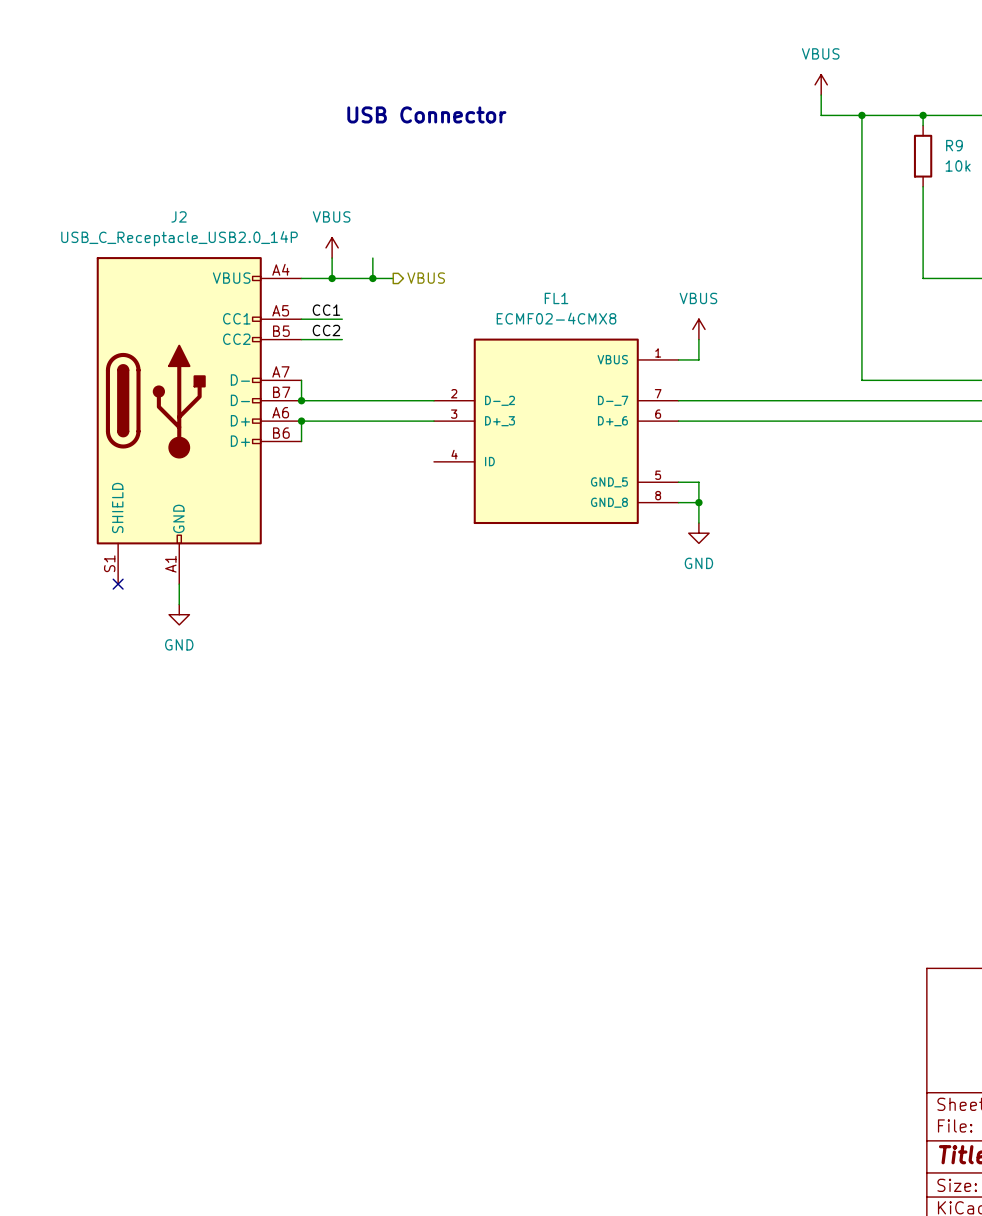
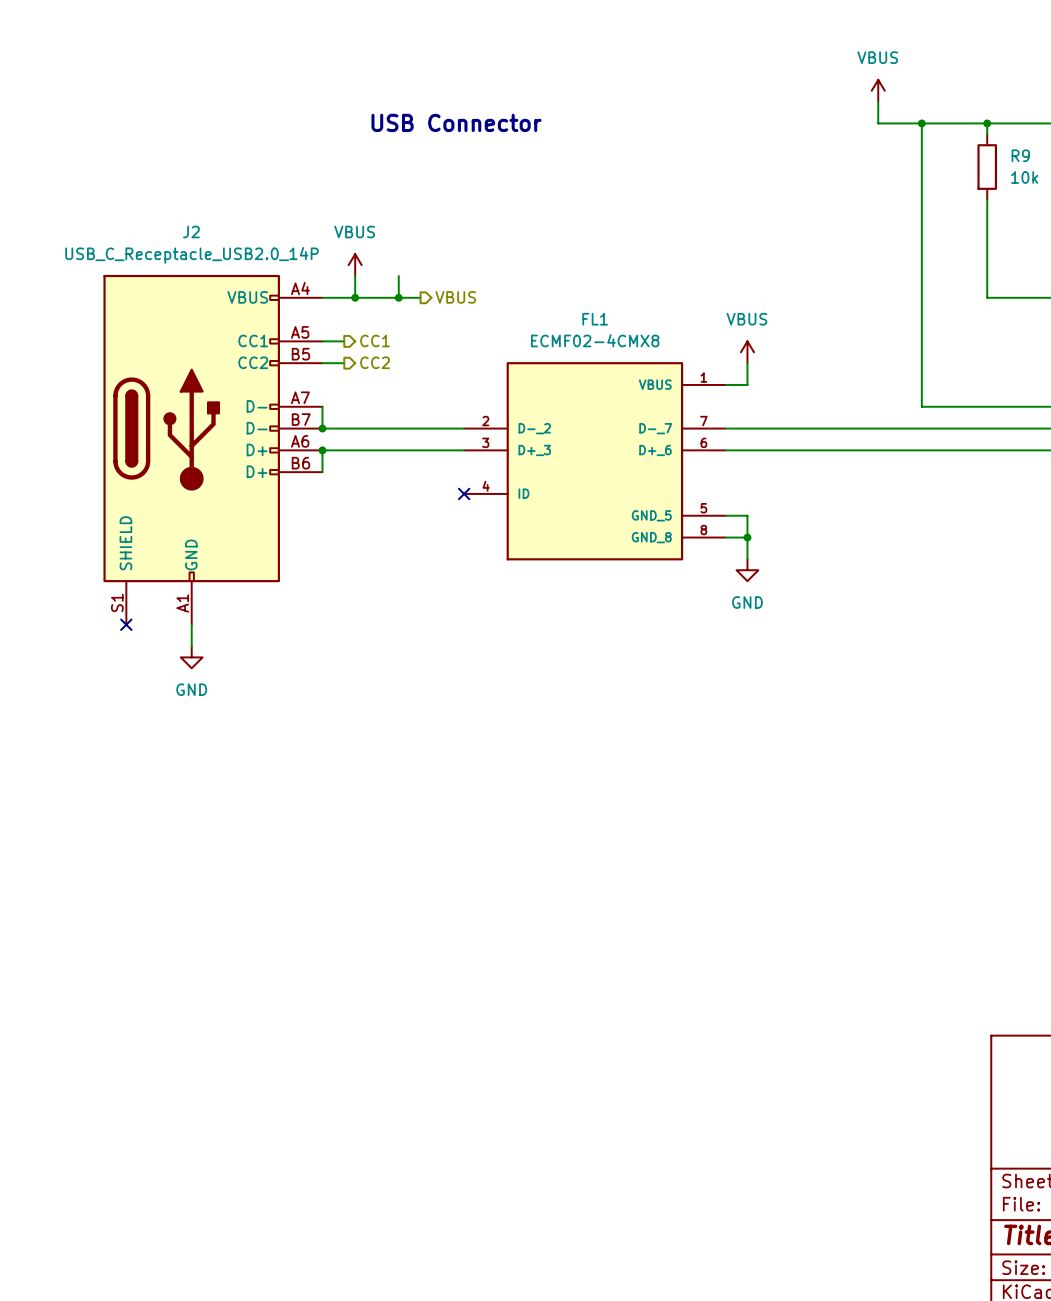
label: CC1 (326, 310) -> none
hierarchical label: none -> CC1 (375, 340)
wire: (321, 319) (342, 319) -> none
label: CC2 (326, 330) -> none
wire: (321, 339) (342, 339) -> none
hierarchical label: none -> CC2 (375, 362)
no-connect mark: none -> (464, 493)

